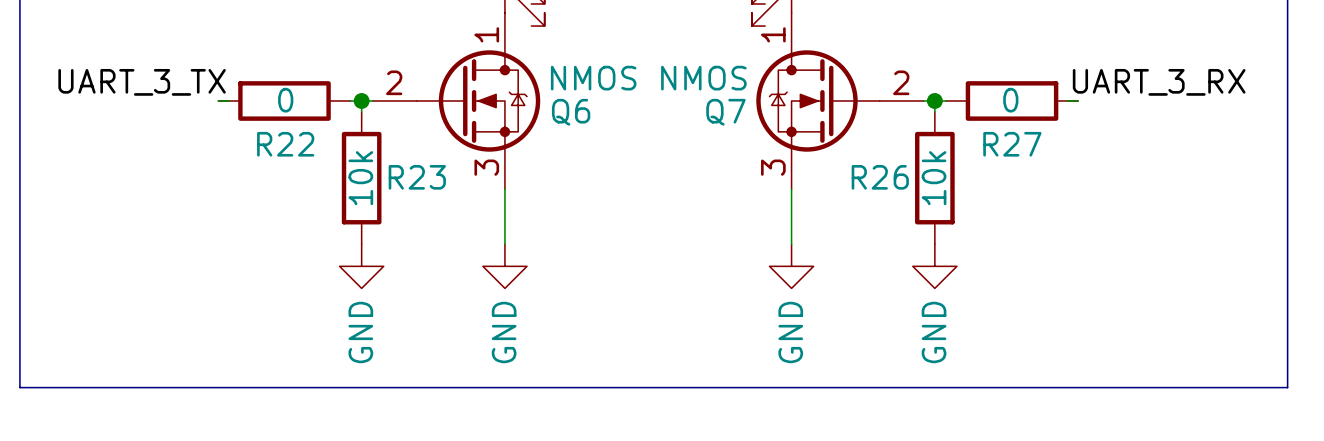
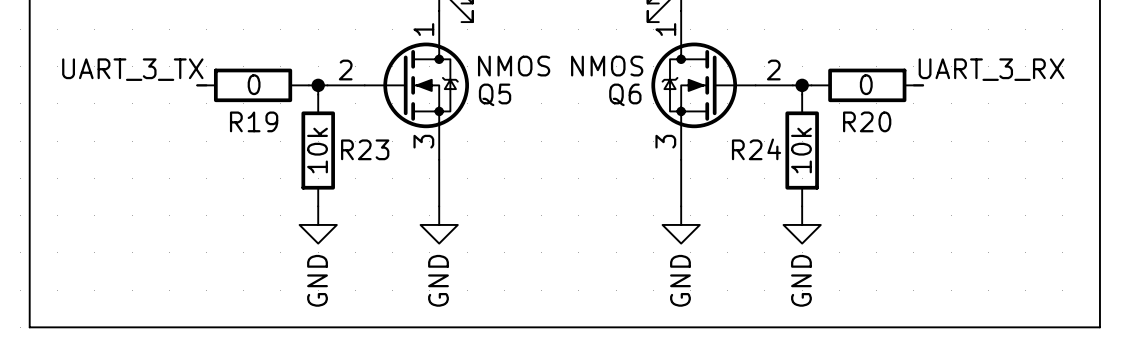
Q6 name: Q6 (571, 112) -> Q5 (495, 94)
Q7 name: Q7 (725, 112) -> Q6 (625, 94)
R22 name: R22 (285, 144) -> R19 (254, 121)
R27 name: R27 (1012, 144) -> R20 (867, 121)
R26 name: R26 (880, 177) -> R24 (756, 149)

